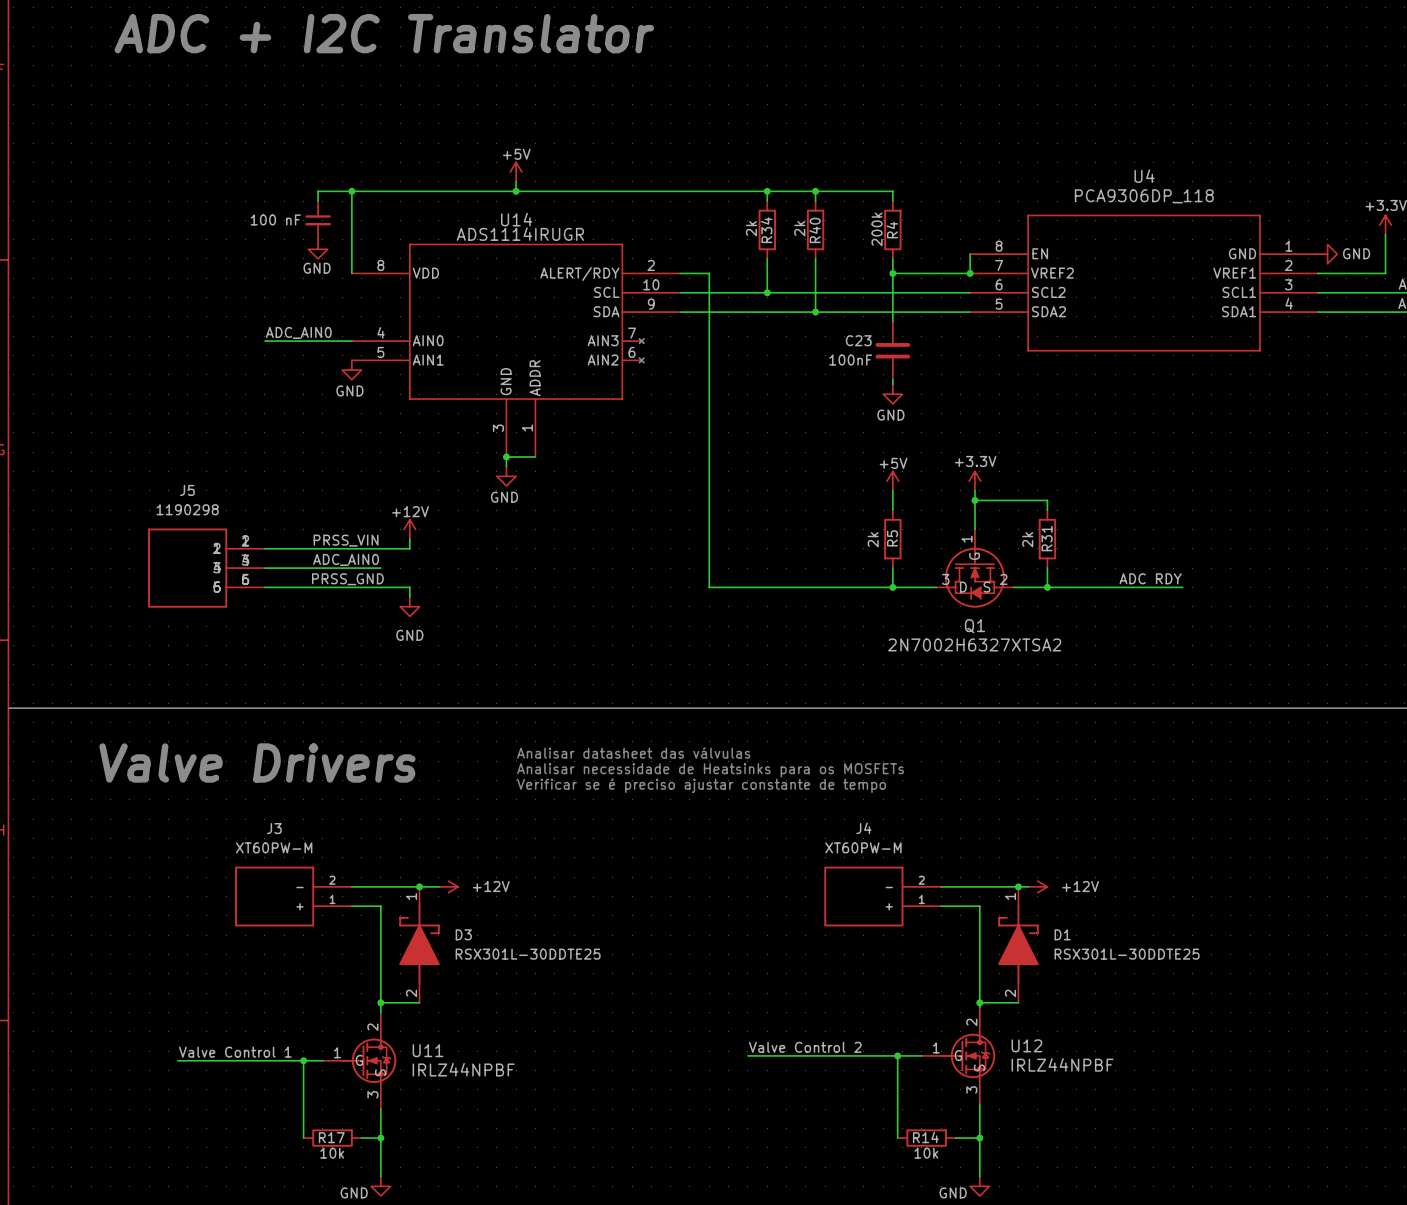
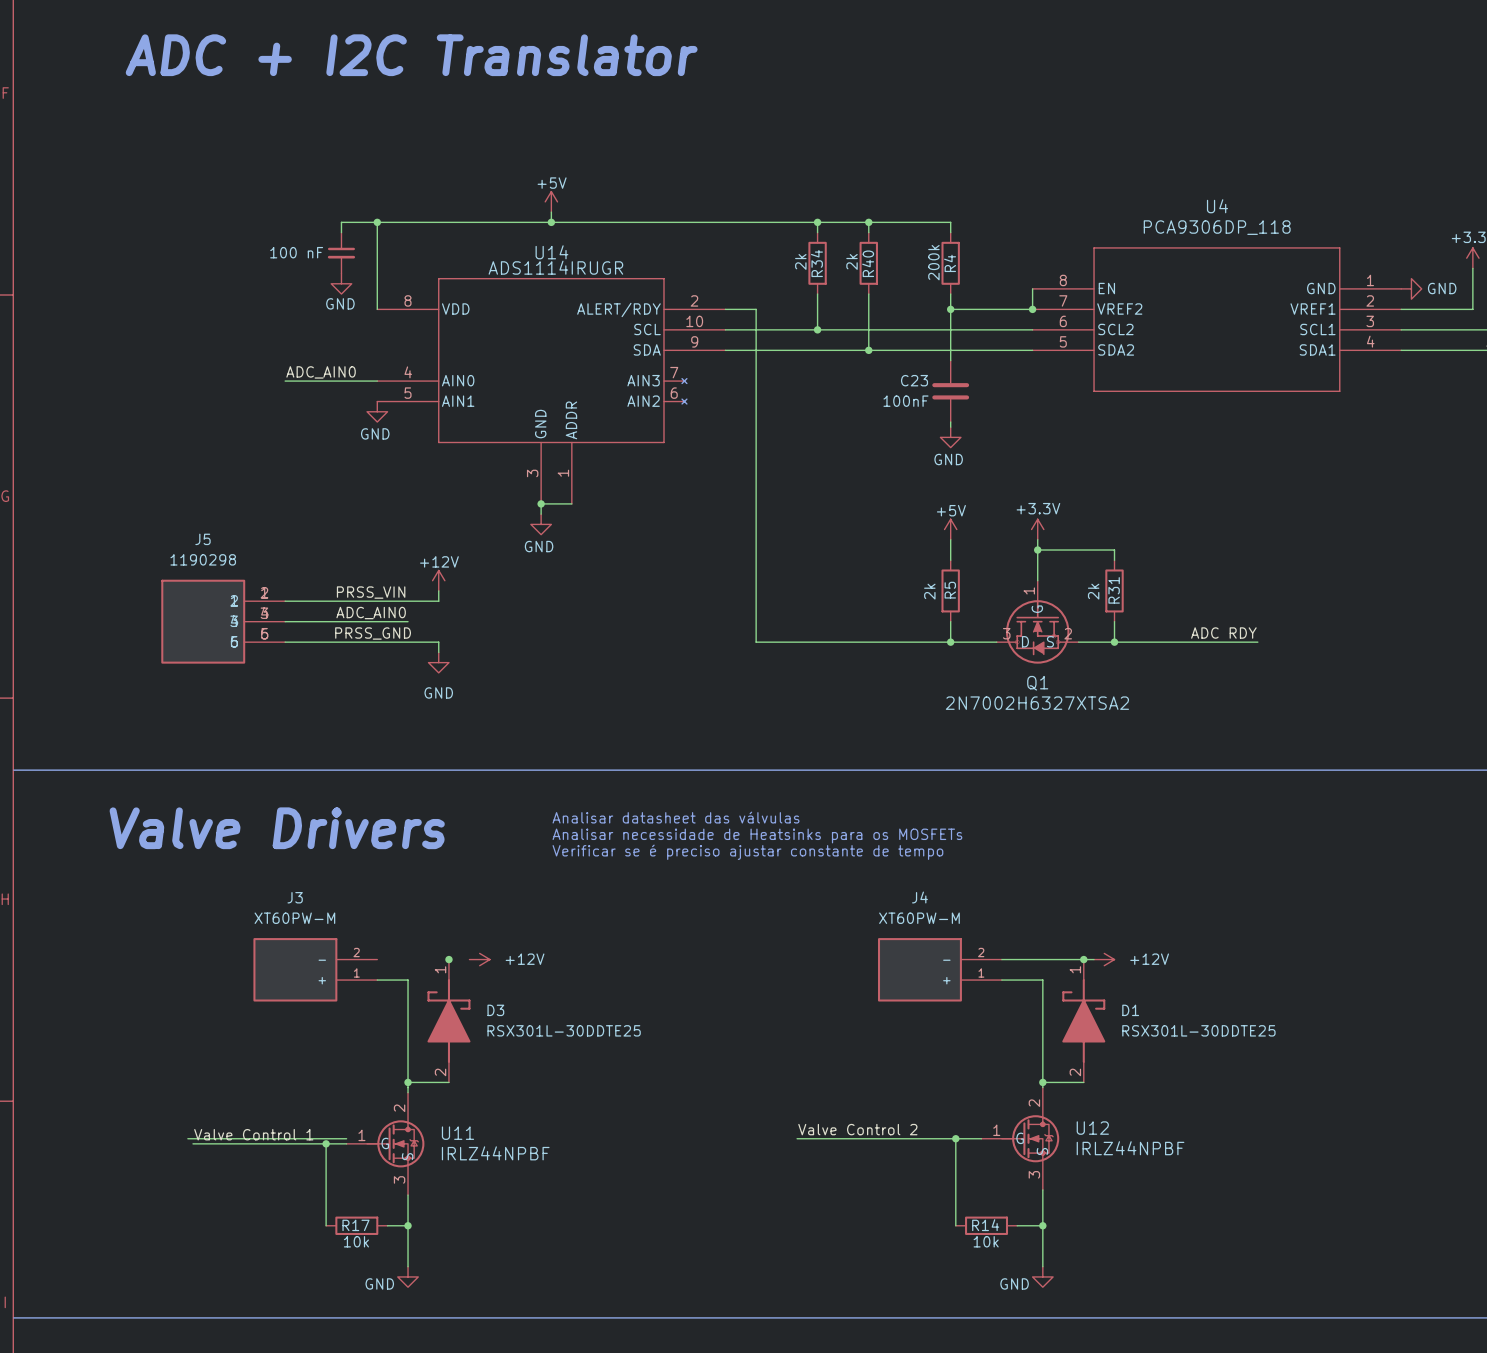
wire: (351, 886) (438, 886) -> none
wire: none -> (187, 1138) (346, 1138)

